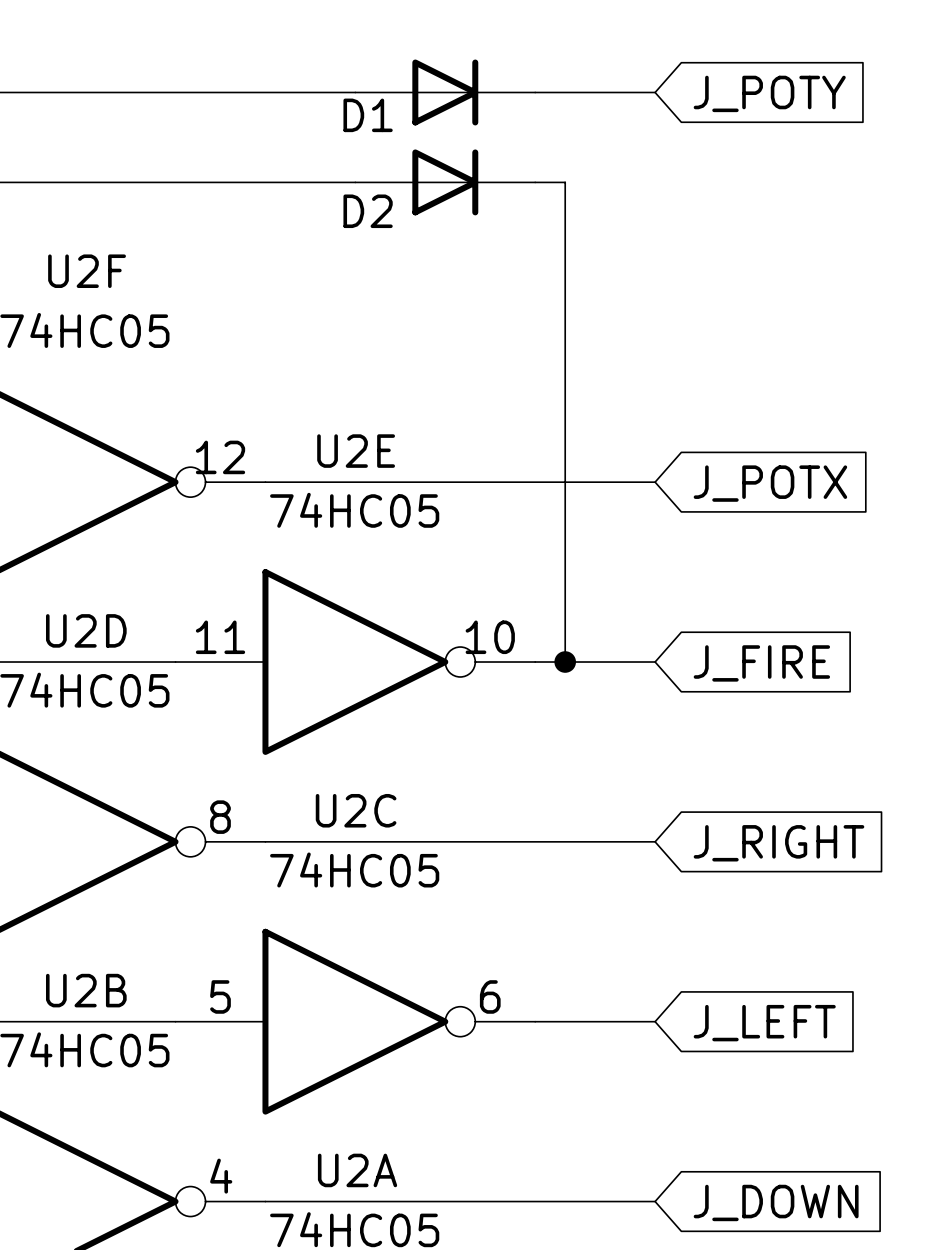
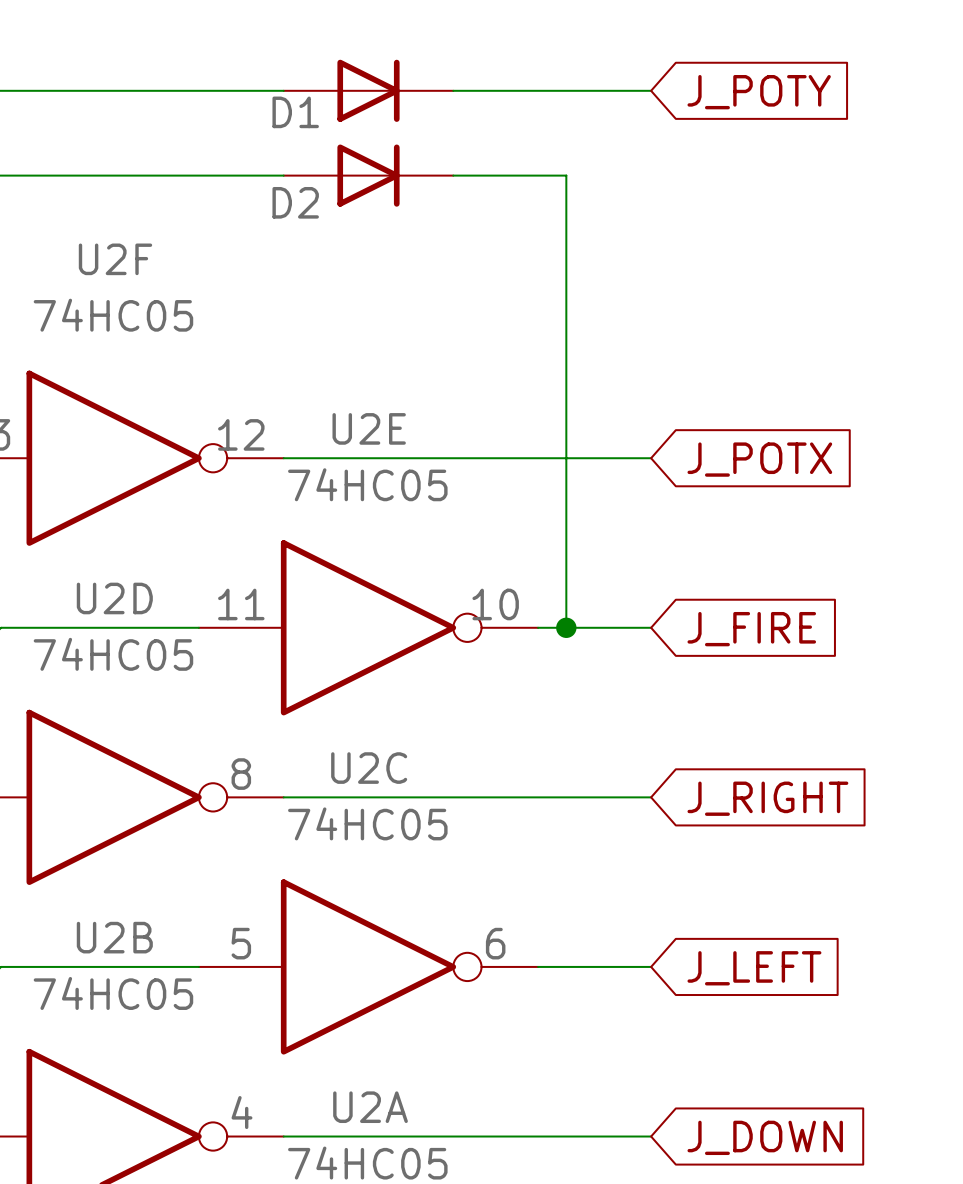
D1 position: (445, 92) -> (368, 90)
D2 position: (445, 182) -> (368, 175)

